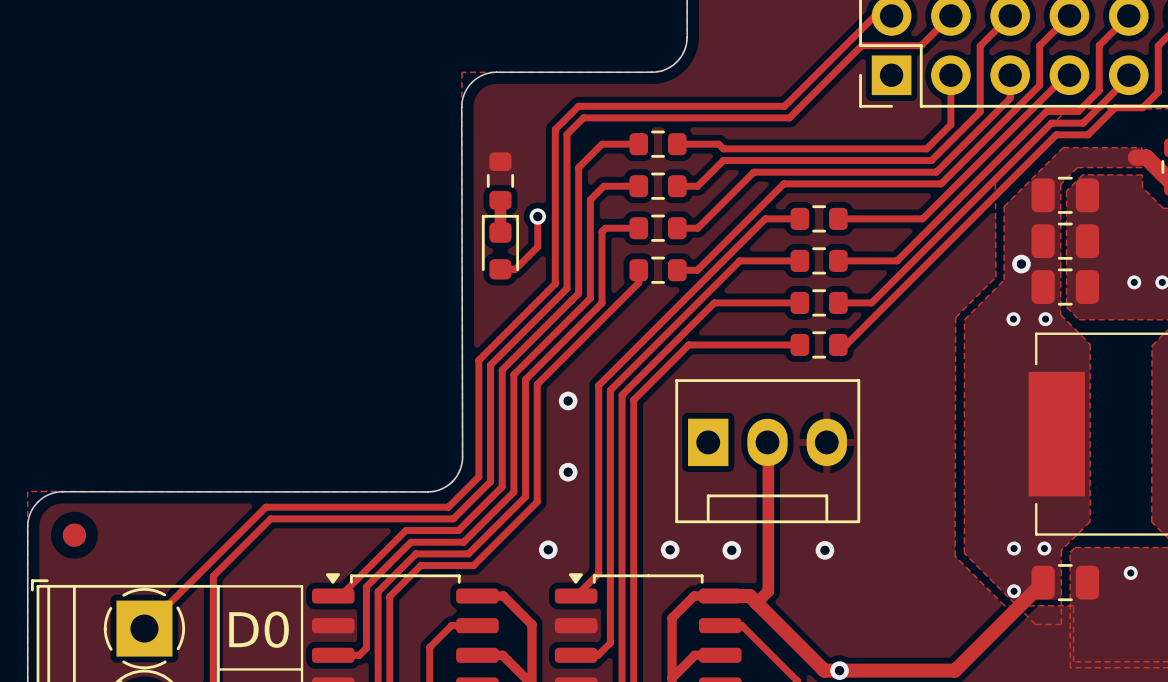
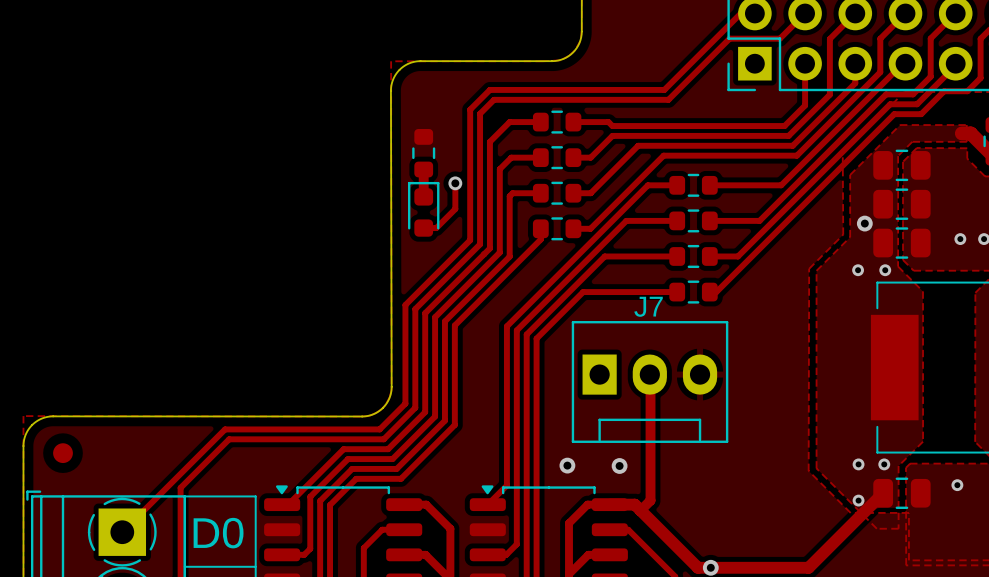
J7 name: none -> J7 (648, 306)
via: (568, 400) -> none
via: (568, 472) -> none
via: (548, 549) -> none
via: (824, 550) -> none

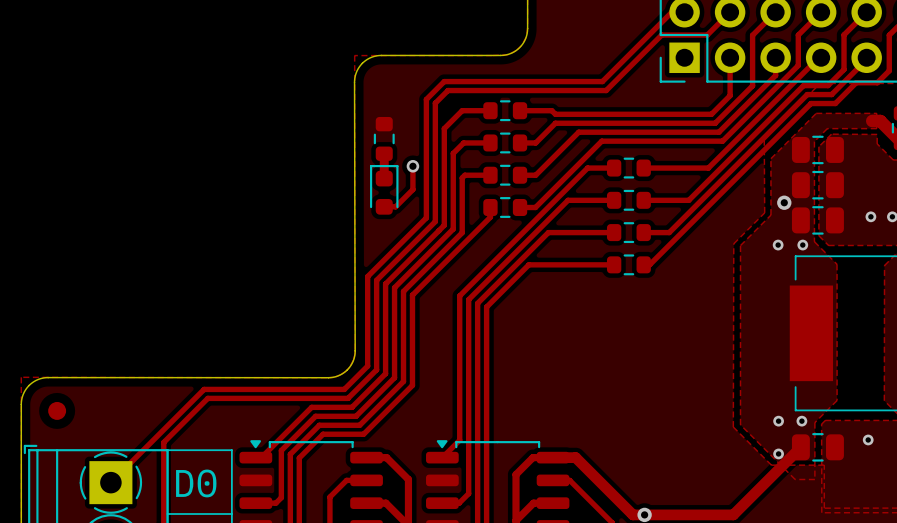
track: (649, 374) (650, 500) (640, 510) -> none
J7: (650, 381) -> none
via: (567, 465) -> none
via: (619, 465) -> none

